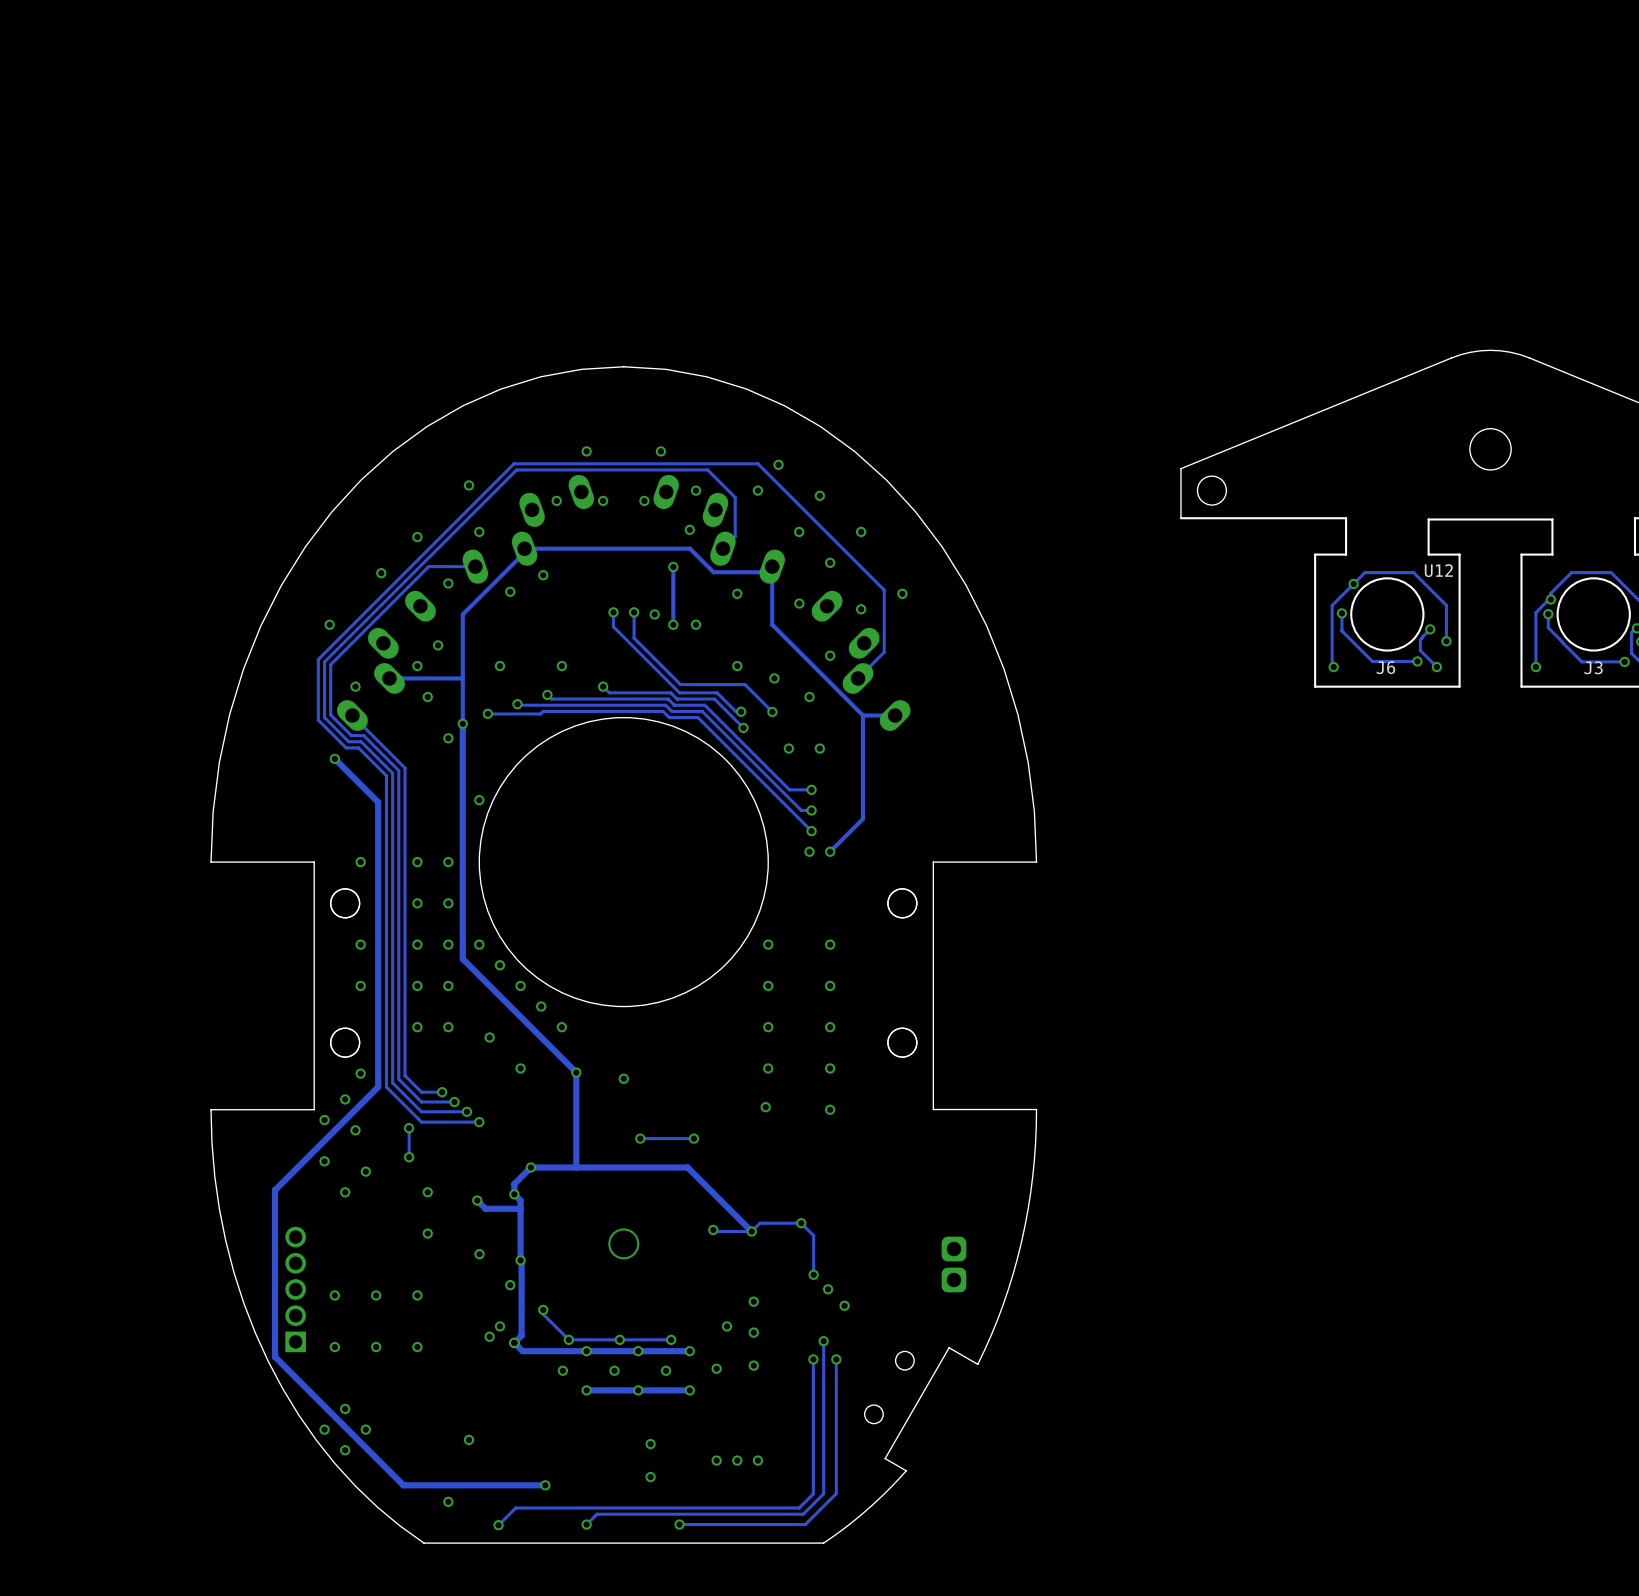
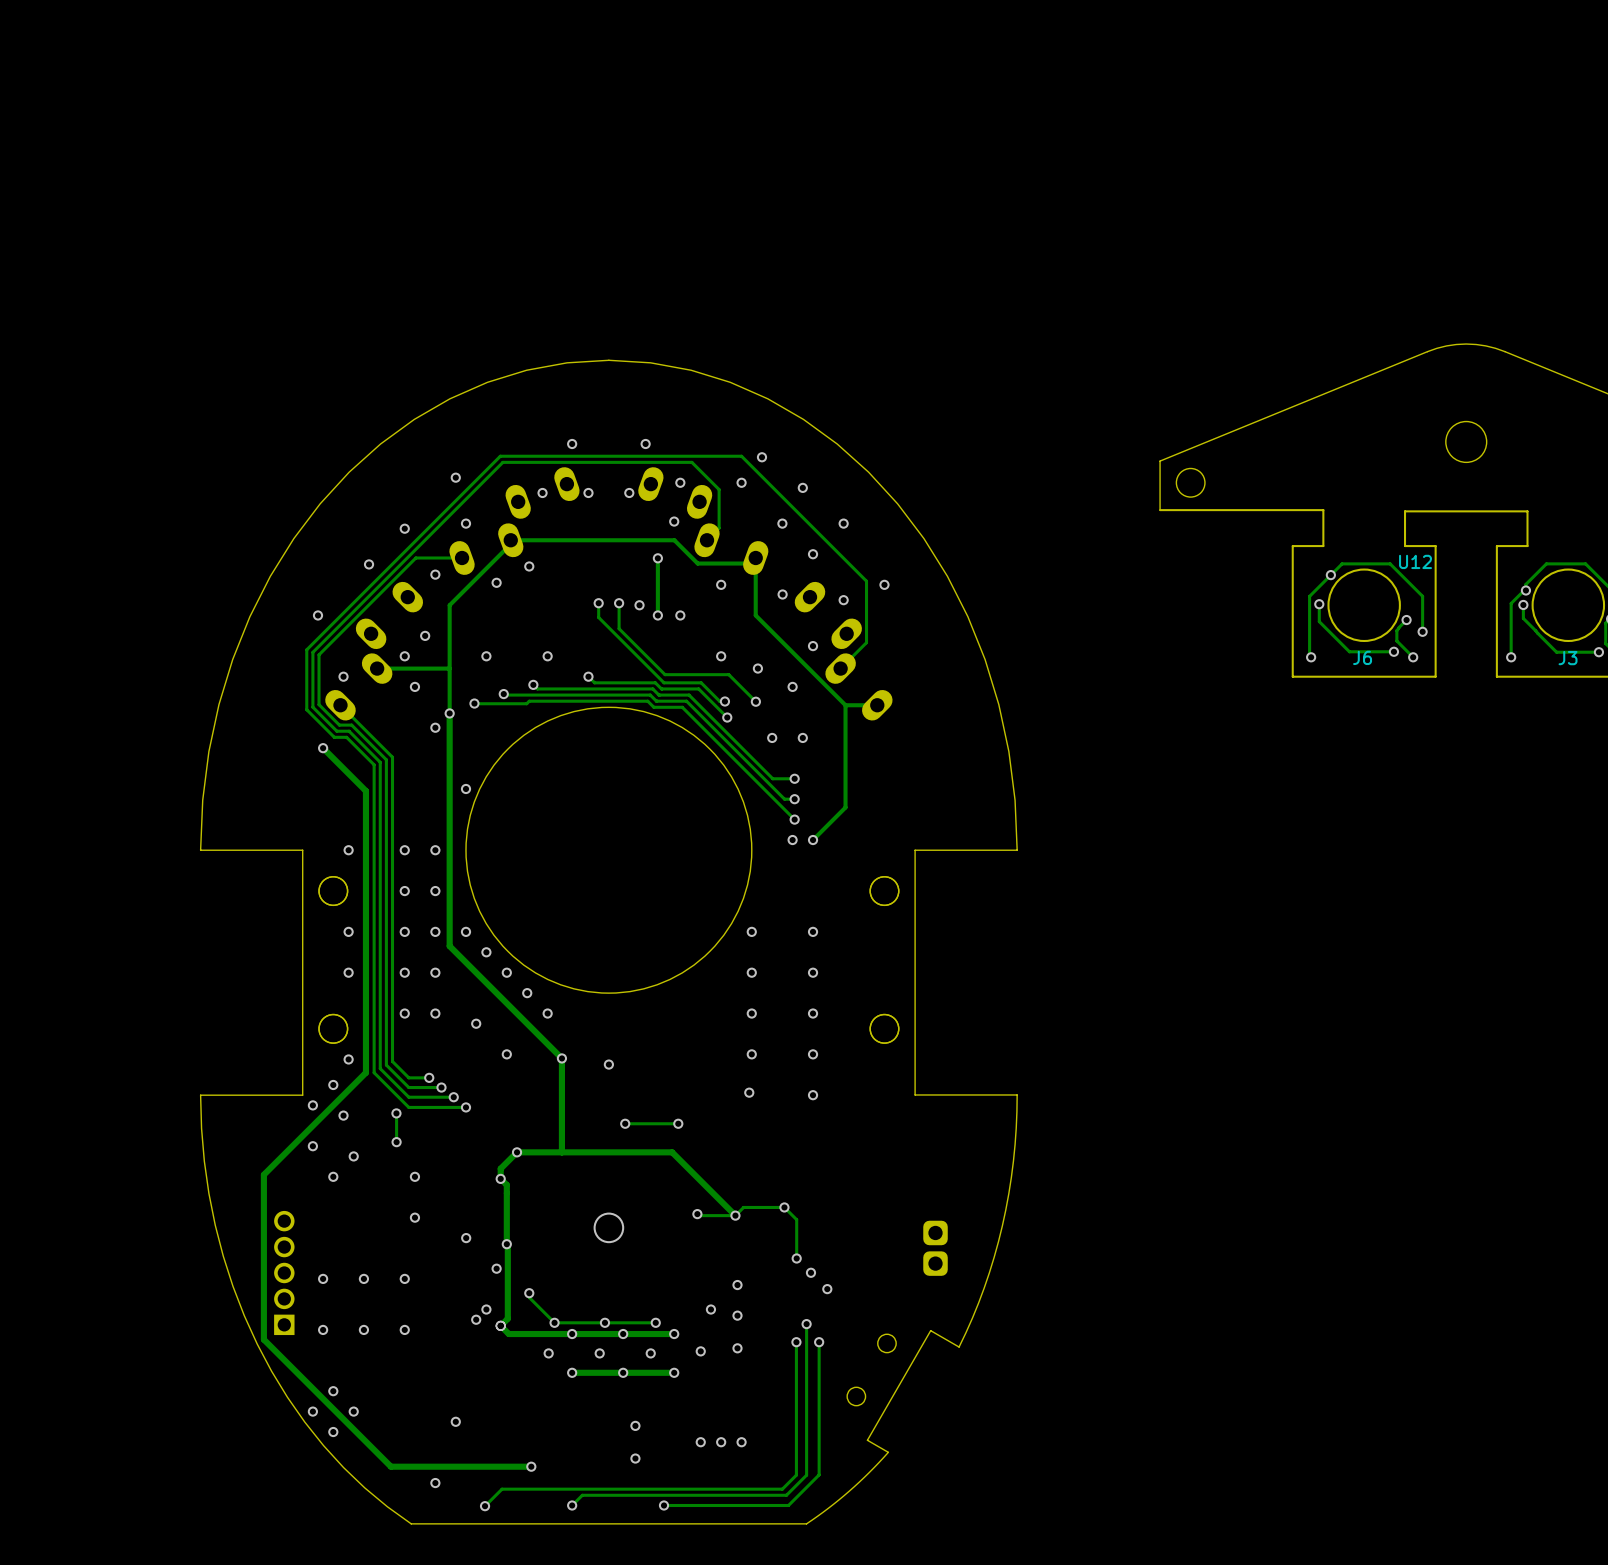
track: (477, 1200) (485, 1208) (520, 1208) -> none
via: (477, 1200) -> none

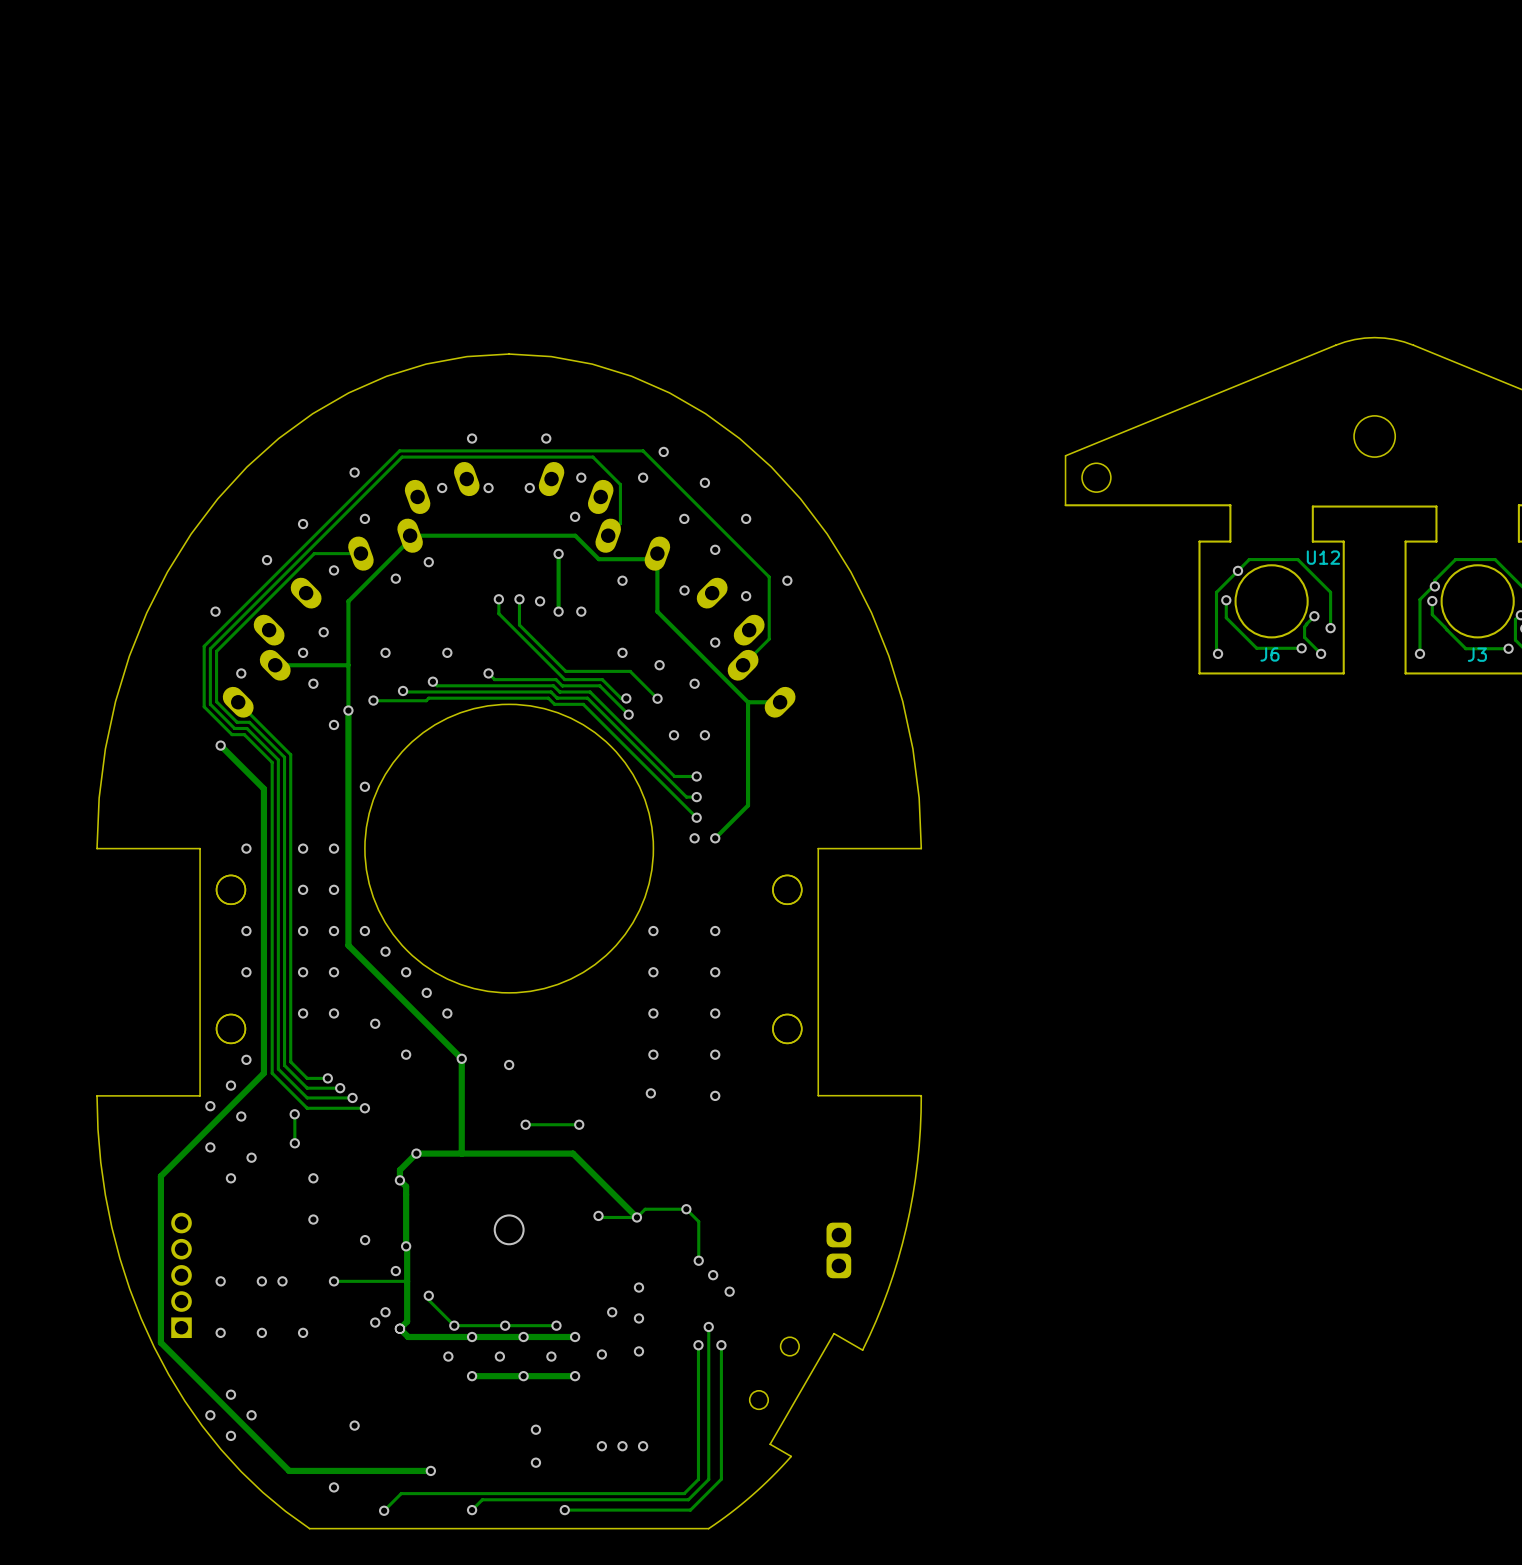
via: none -> (282, 1281)
via: (404, 1278) -> none
via: none -> (334, 1281)
track: none -> (407, 1281) (334, 1281)

